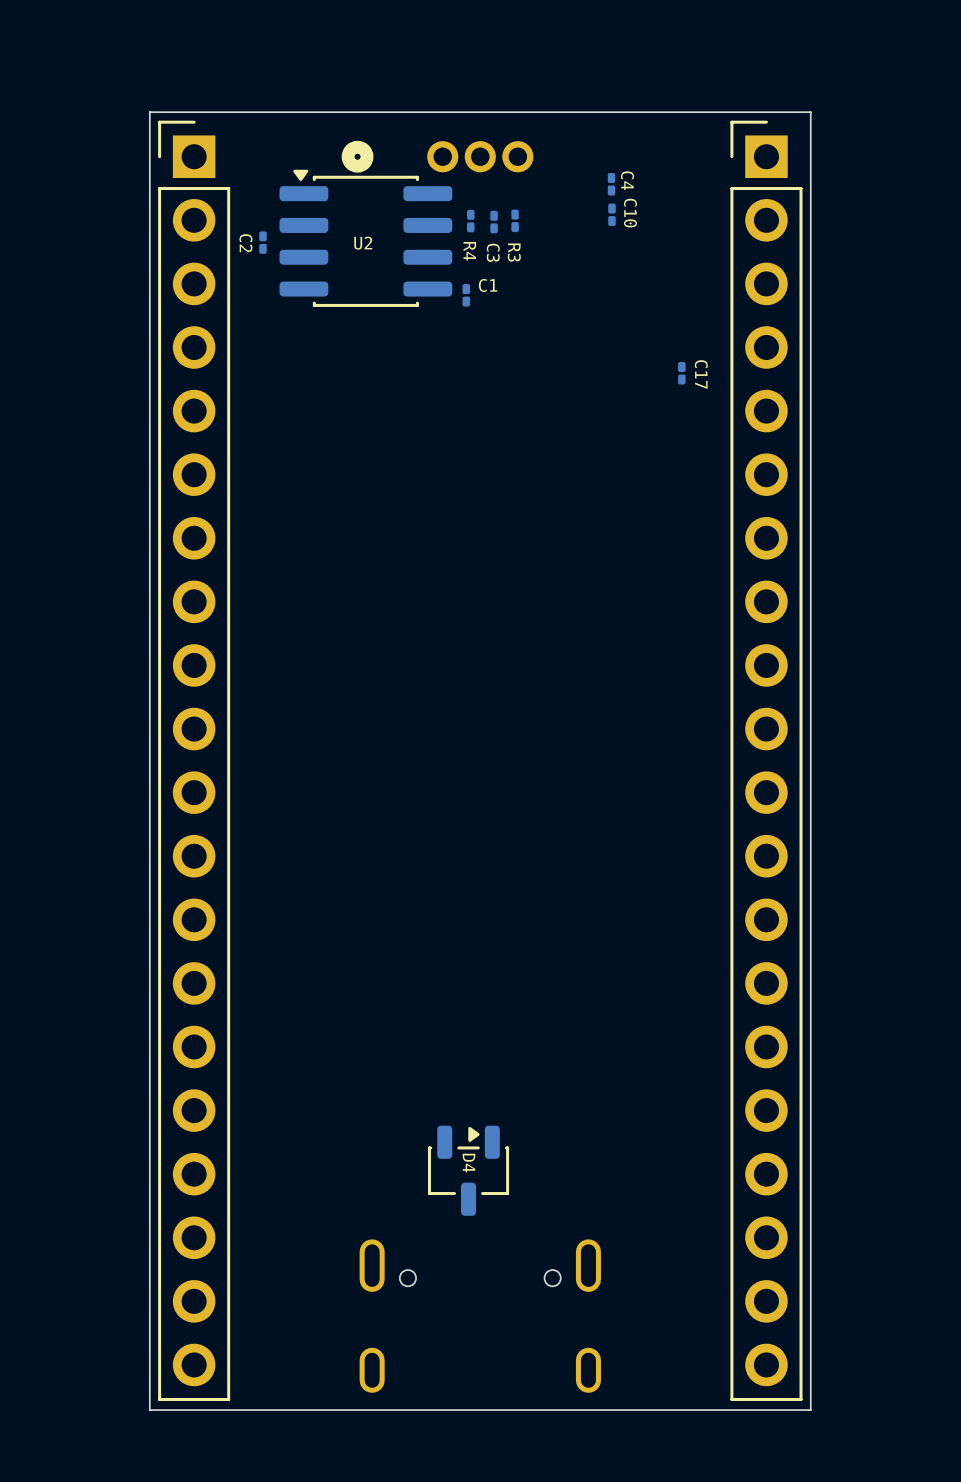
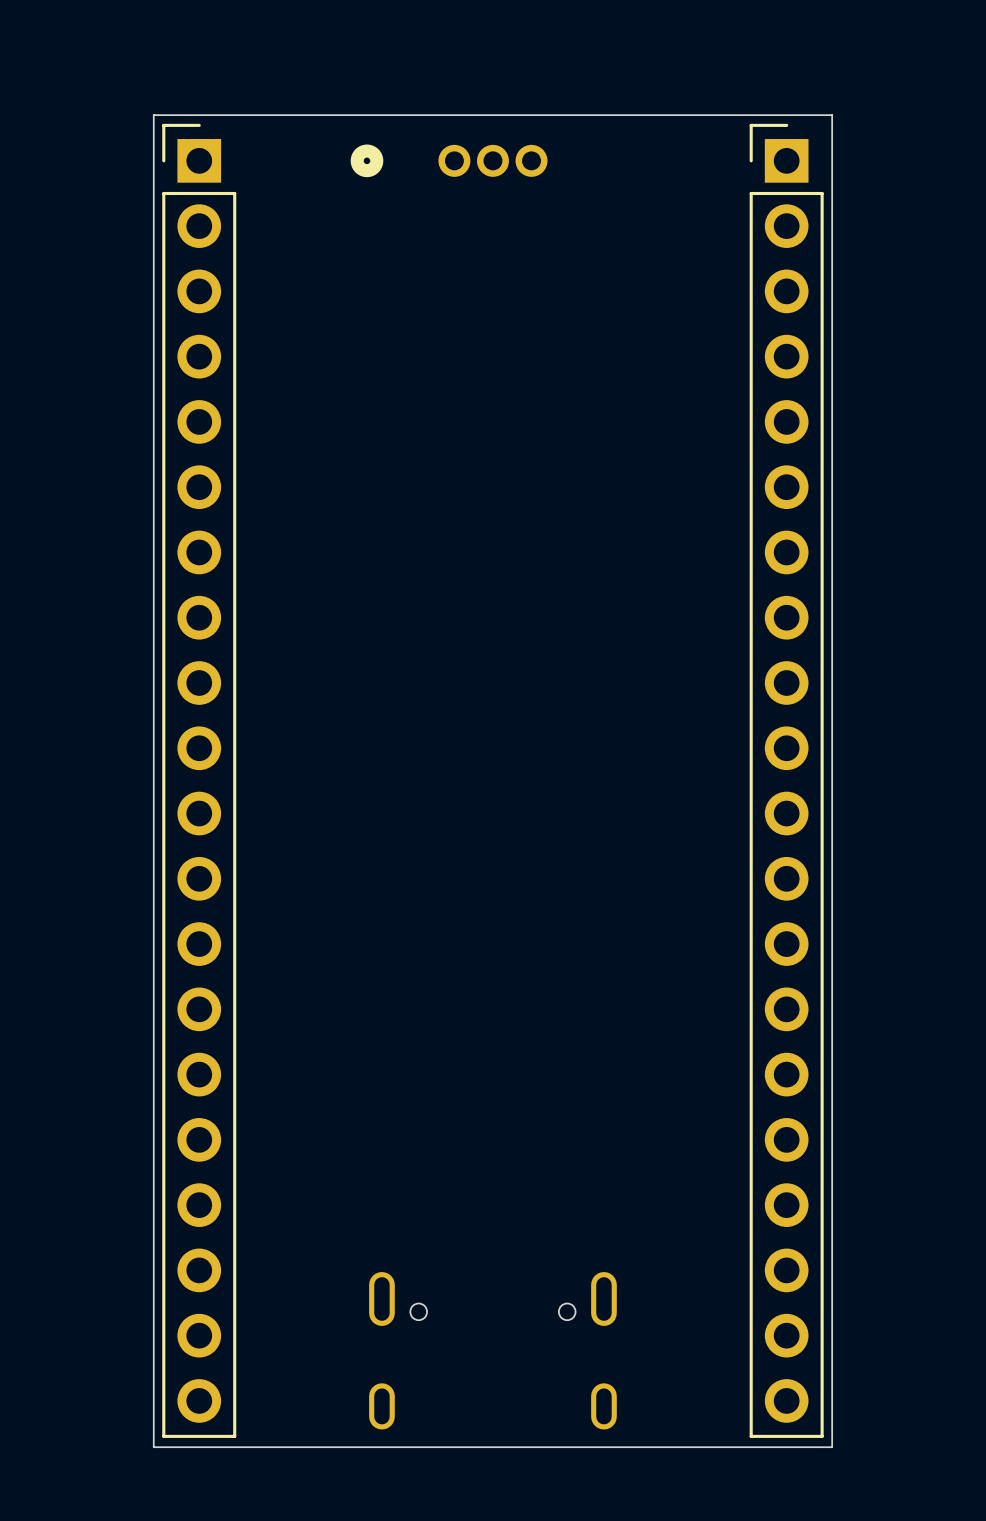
C4: (611, 184) -> none
C10: (611, 214) -> none
R3: (515, 220) -> none
R4: (470, 221) -> none
C3: (494, 222) -> none
U2: (365, 238) -> none
C2: (262, 242) -> none
C1: (466, 295) -> none
C17: (681, 373) -> none
D4: (468, 1170) -> none

